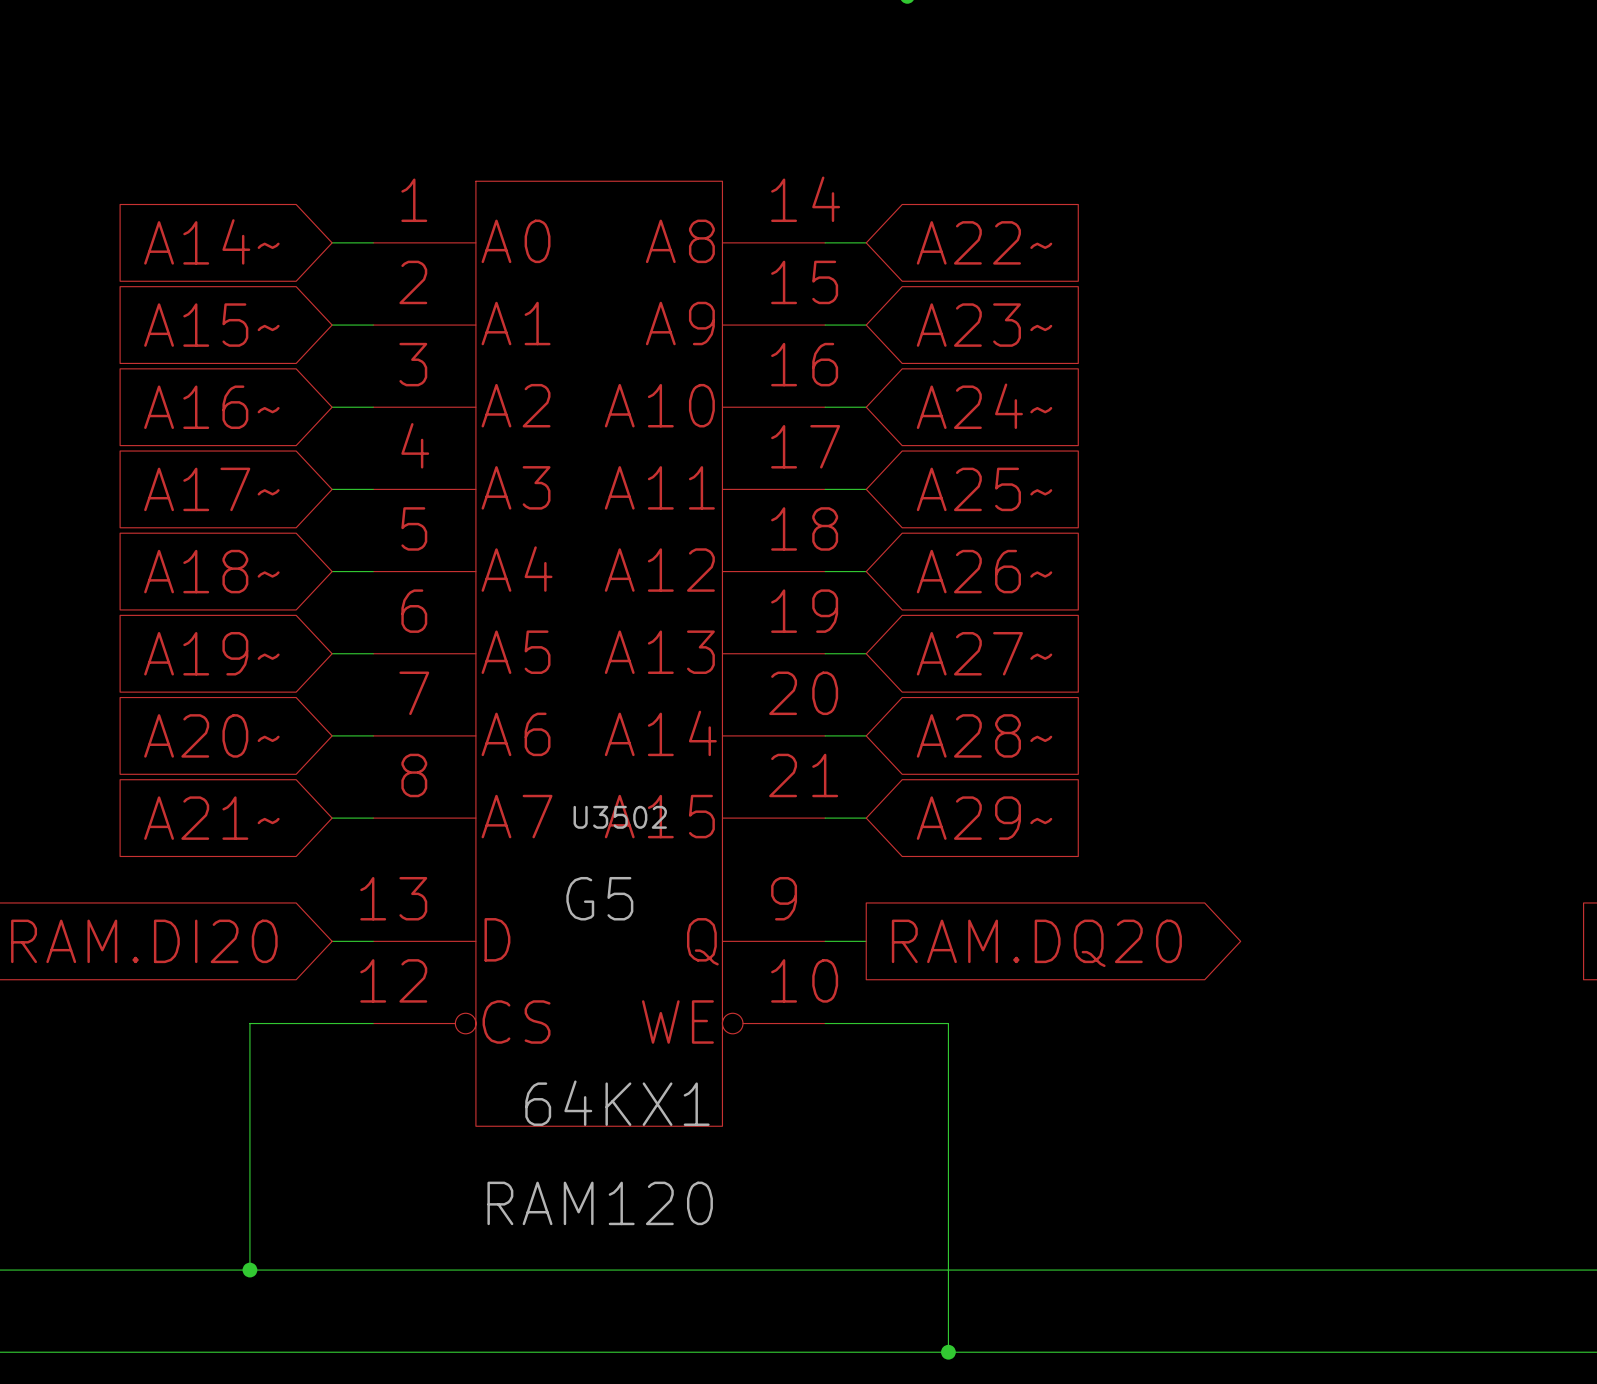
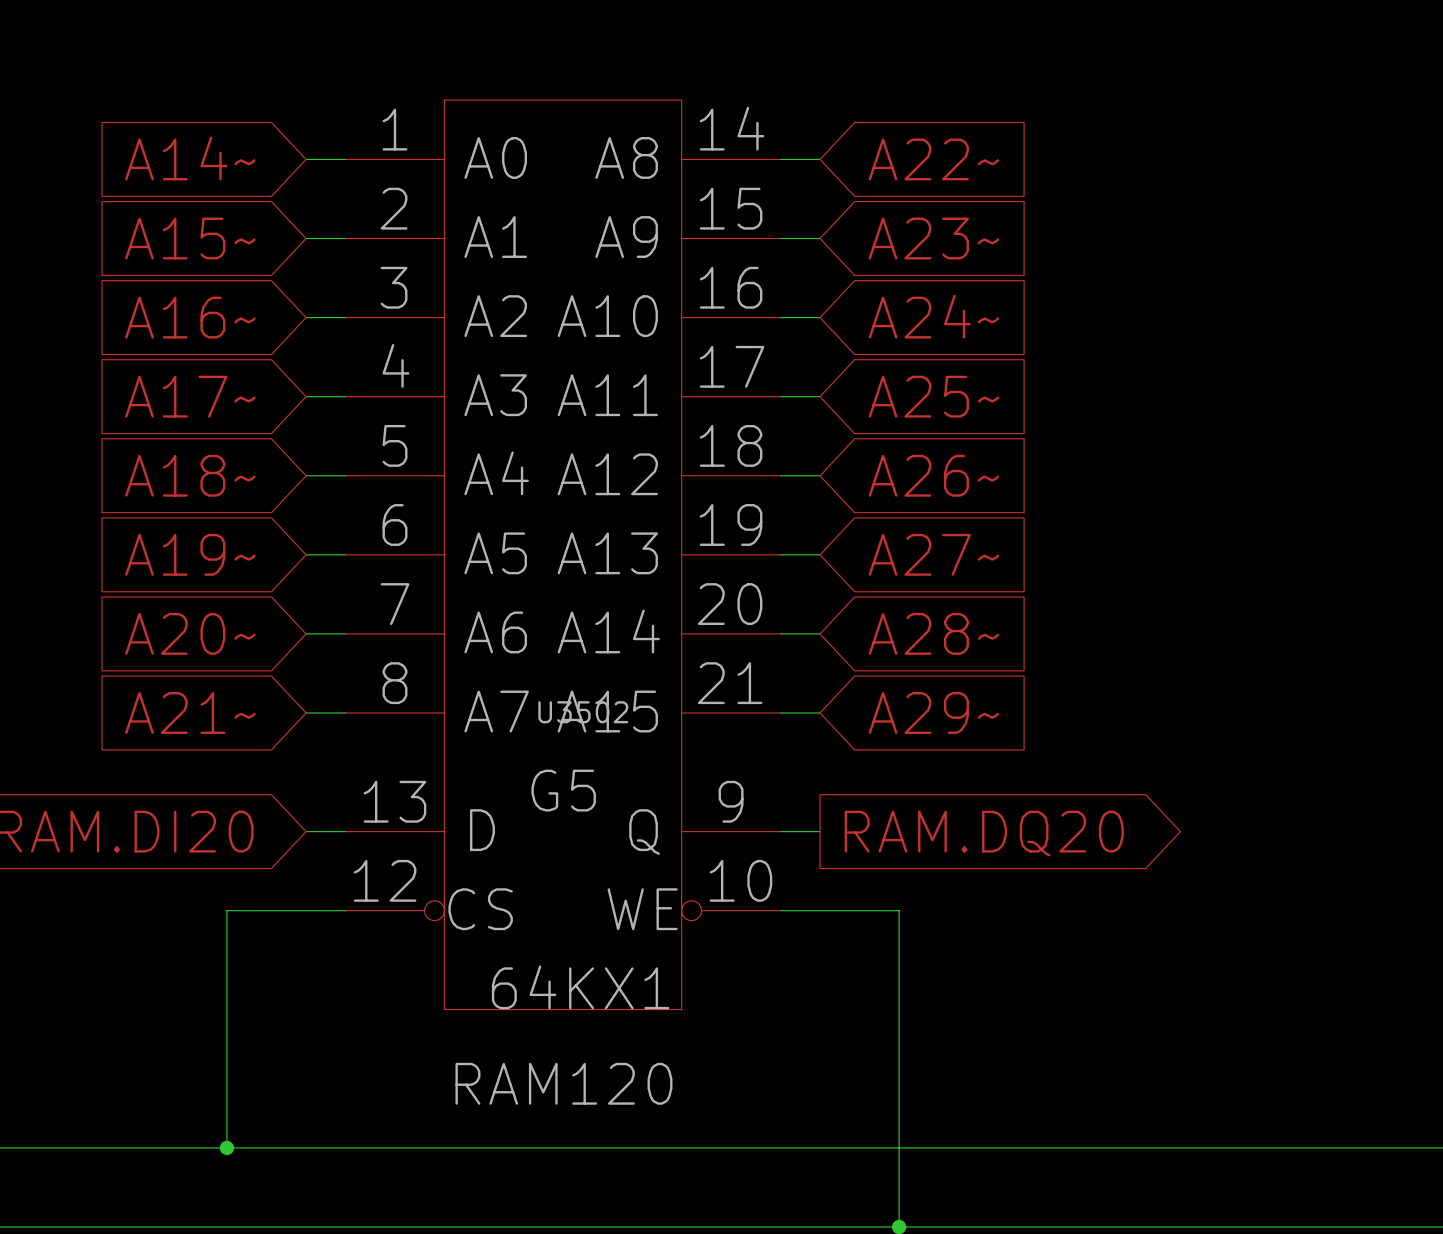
U3502 symbol: [373, 181, 826, 1127] -> [345, 100, 781, 1010]

